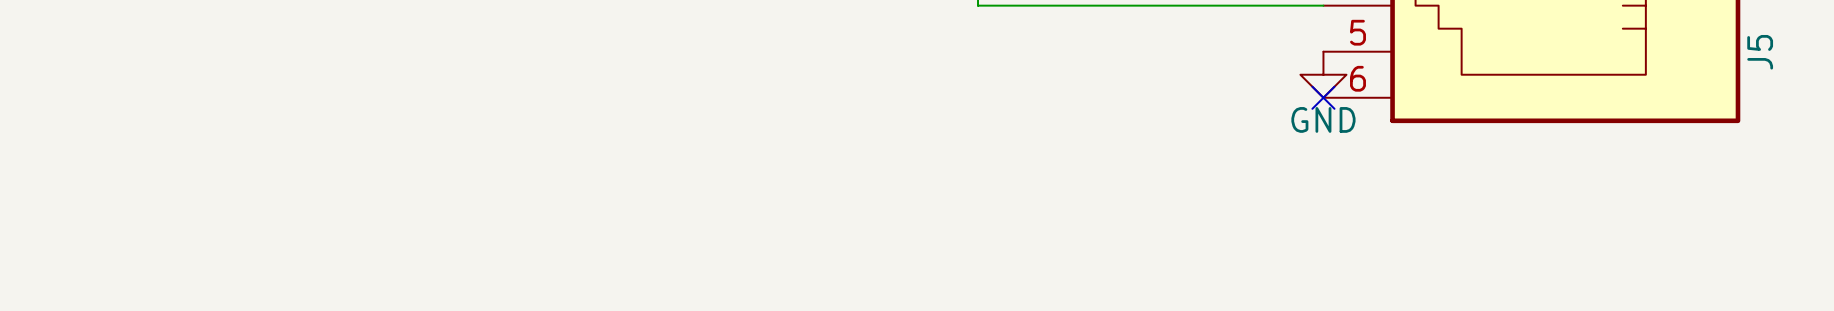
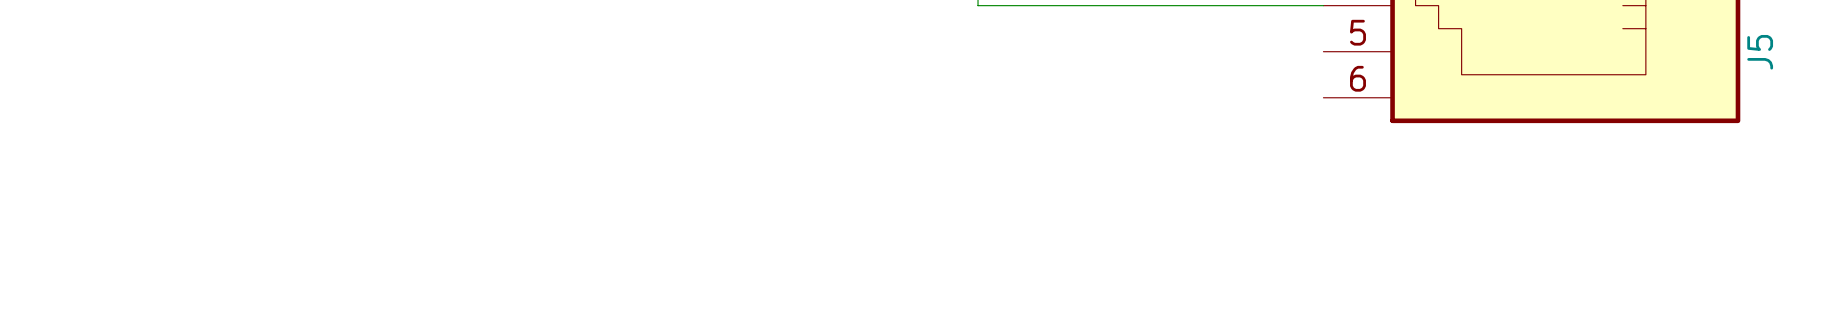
power symbol: GND (1323, 74) -> none
no-connect mark: (1323, 97) -> none

